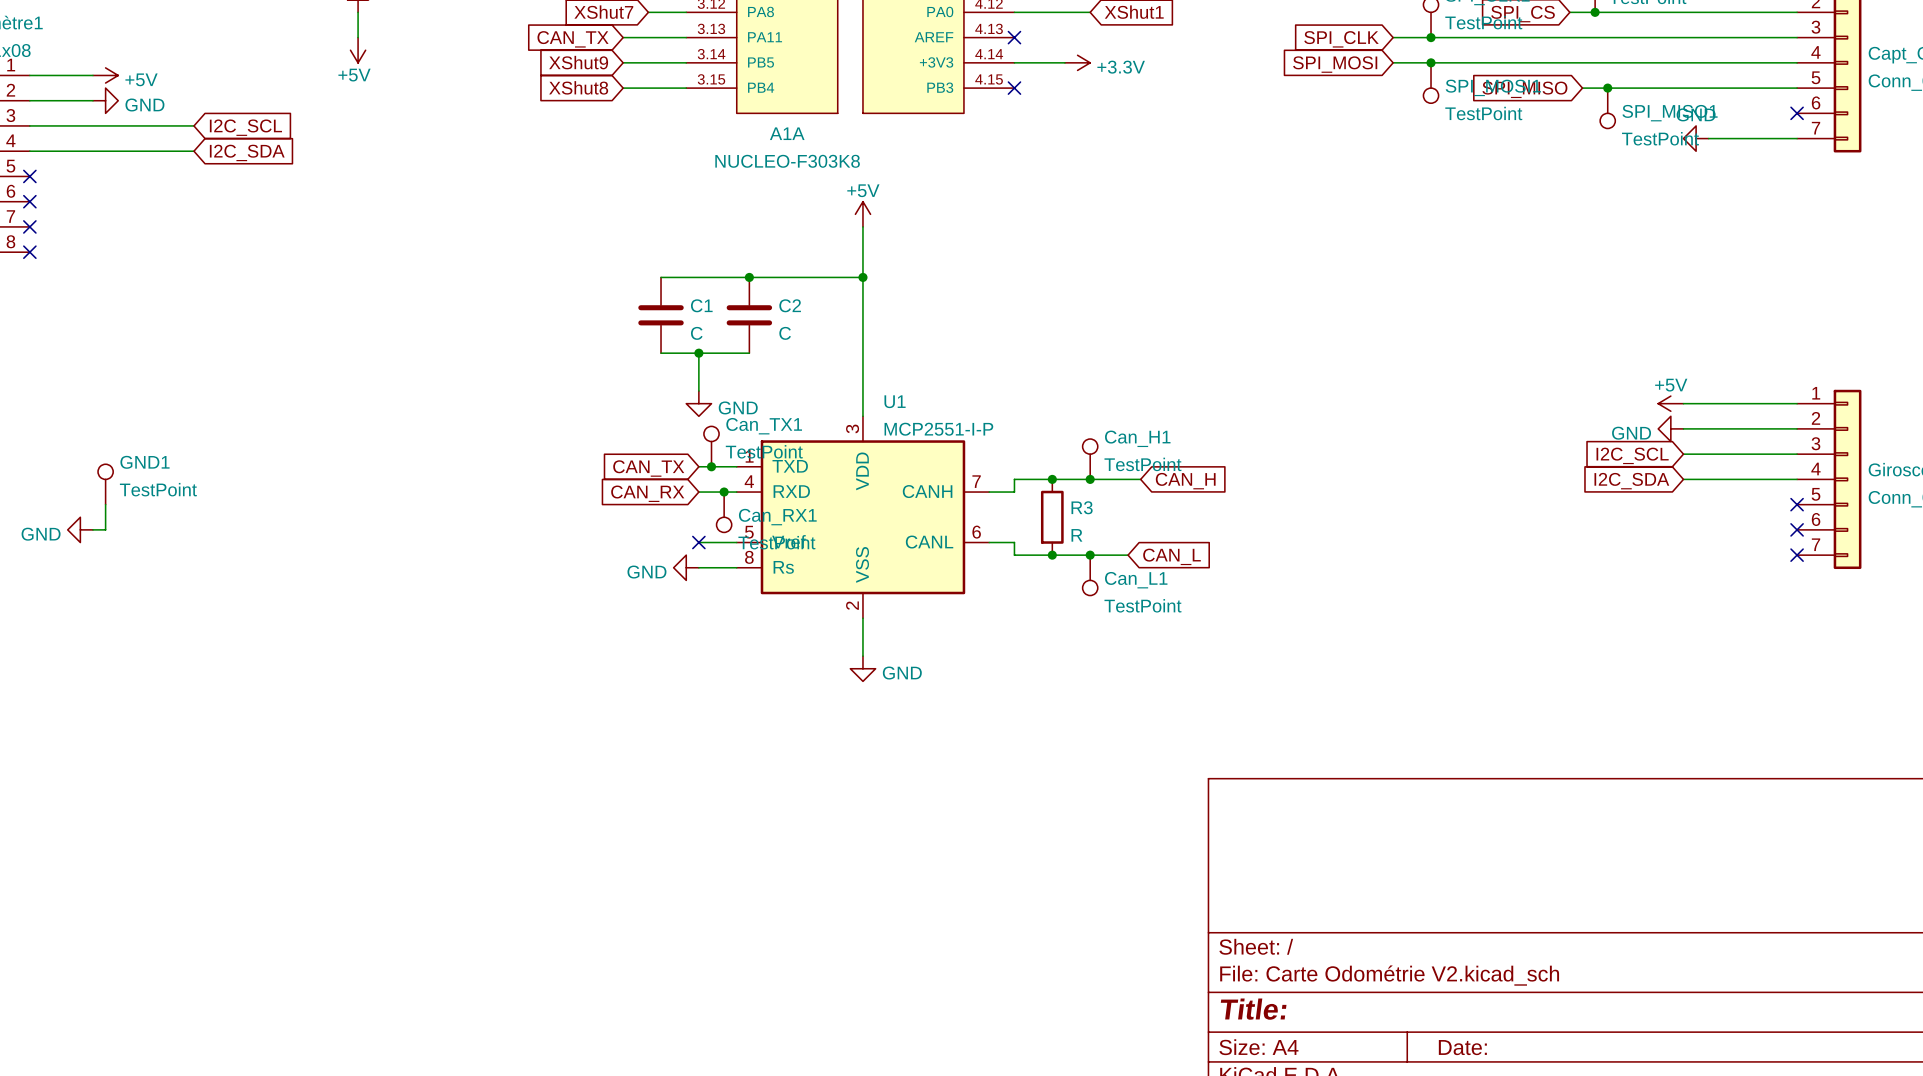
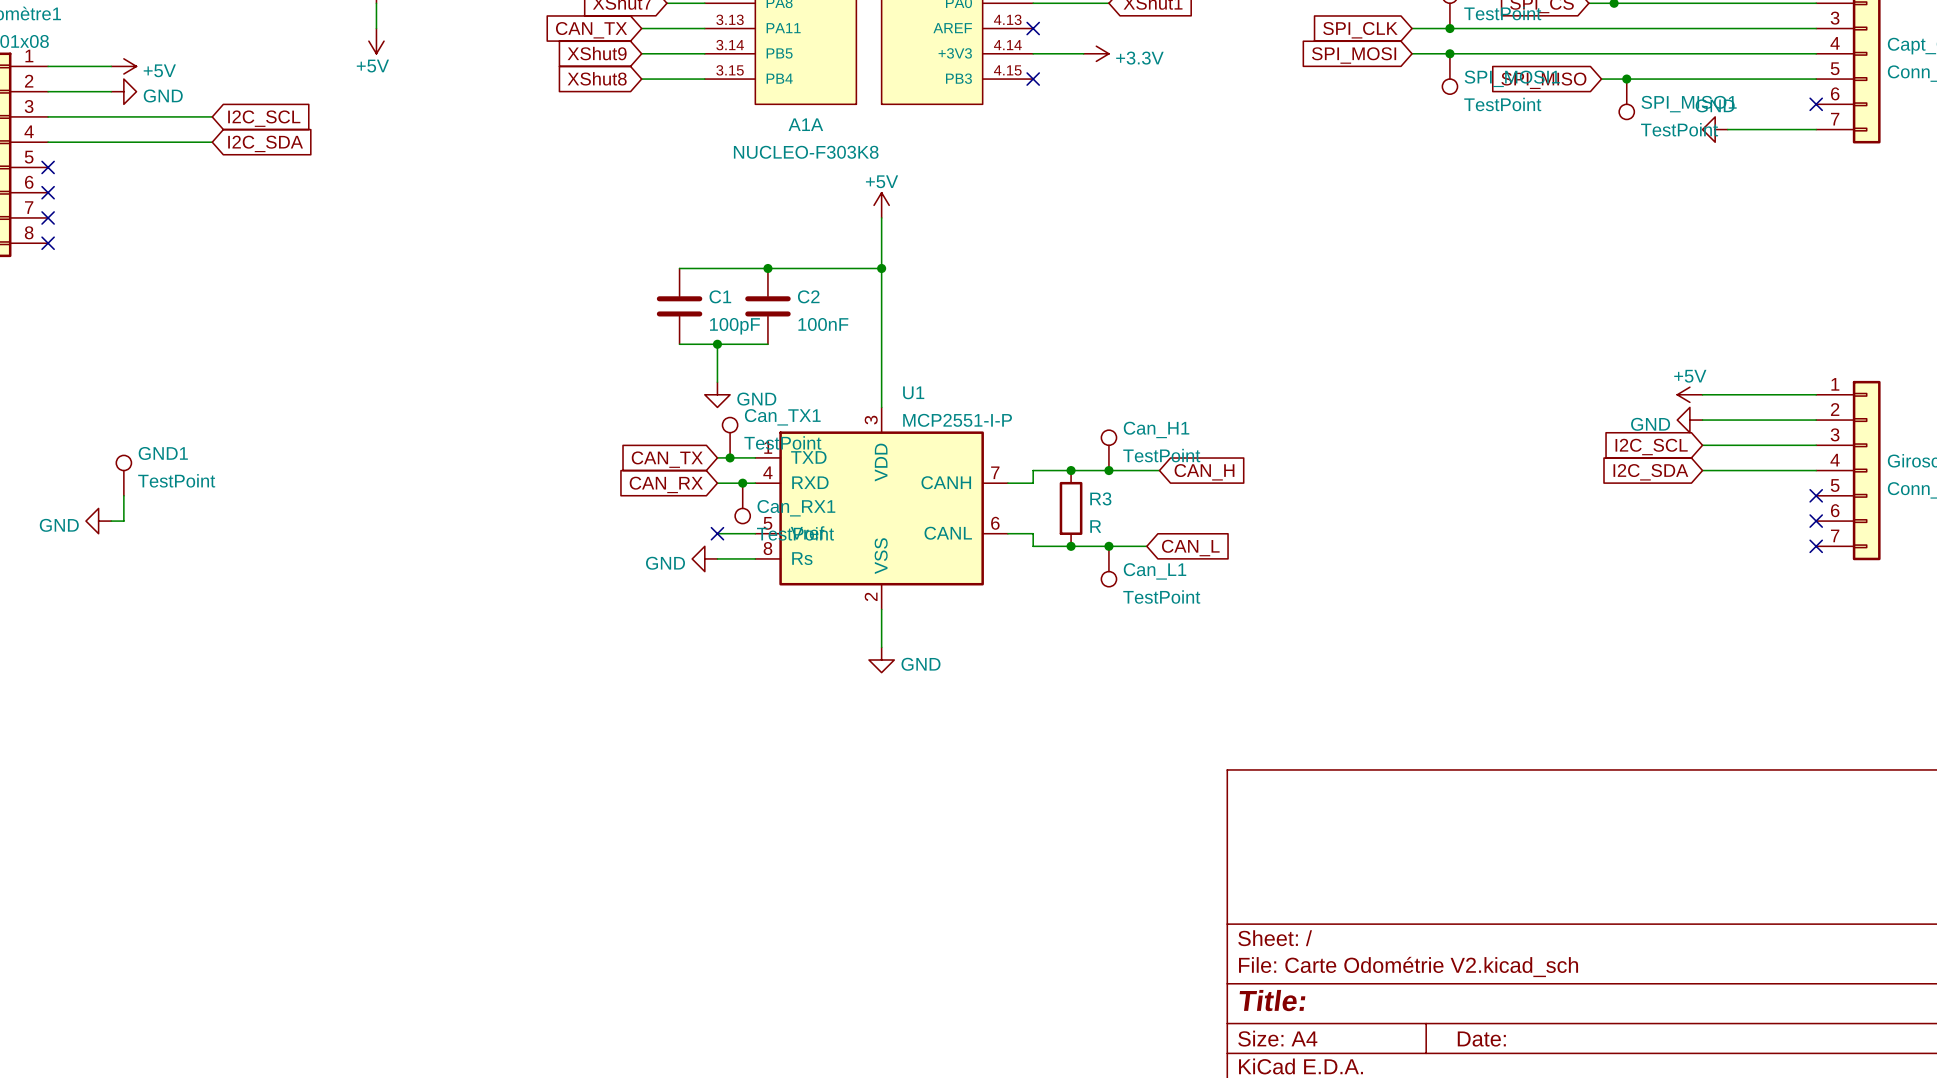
C1 value: C (696, 333) -> 100pF (734, 326)
C2 value: C (785, 333) -> 100nF (823, 324)

